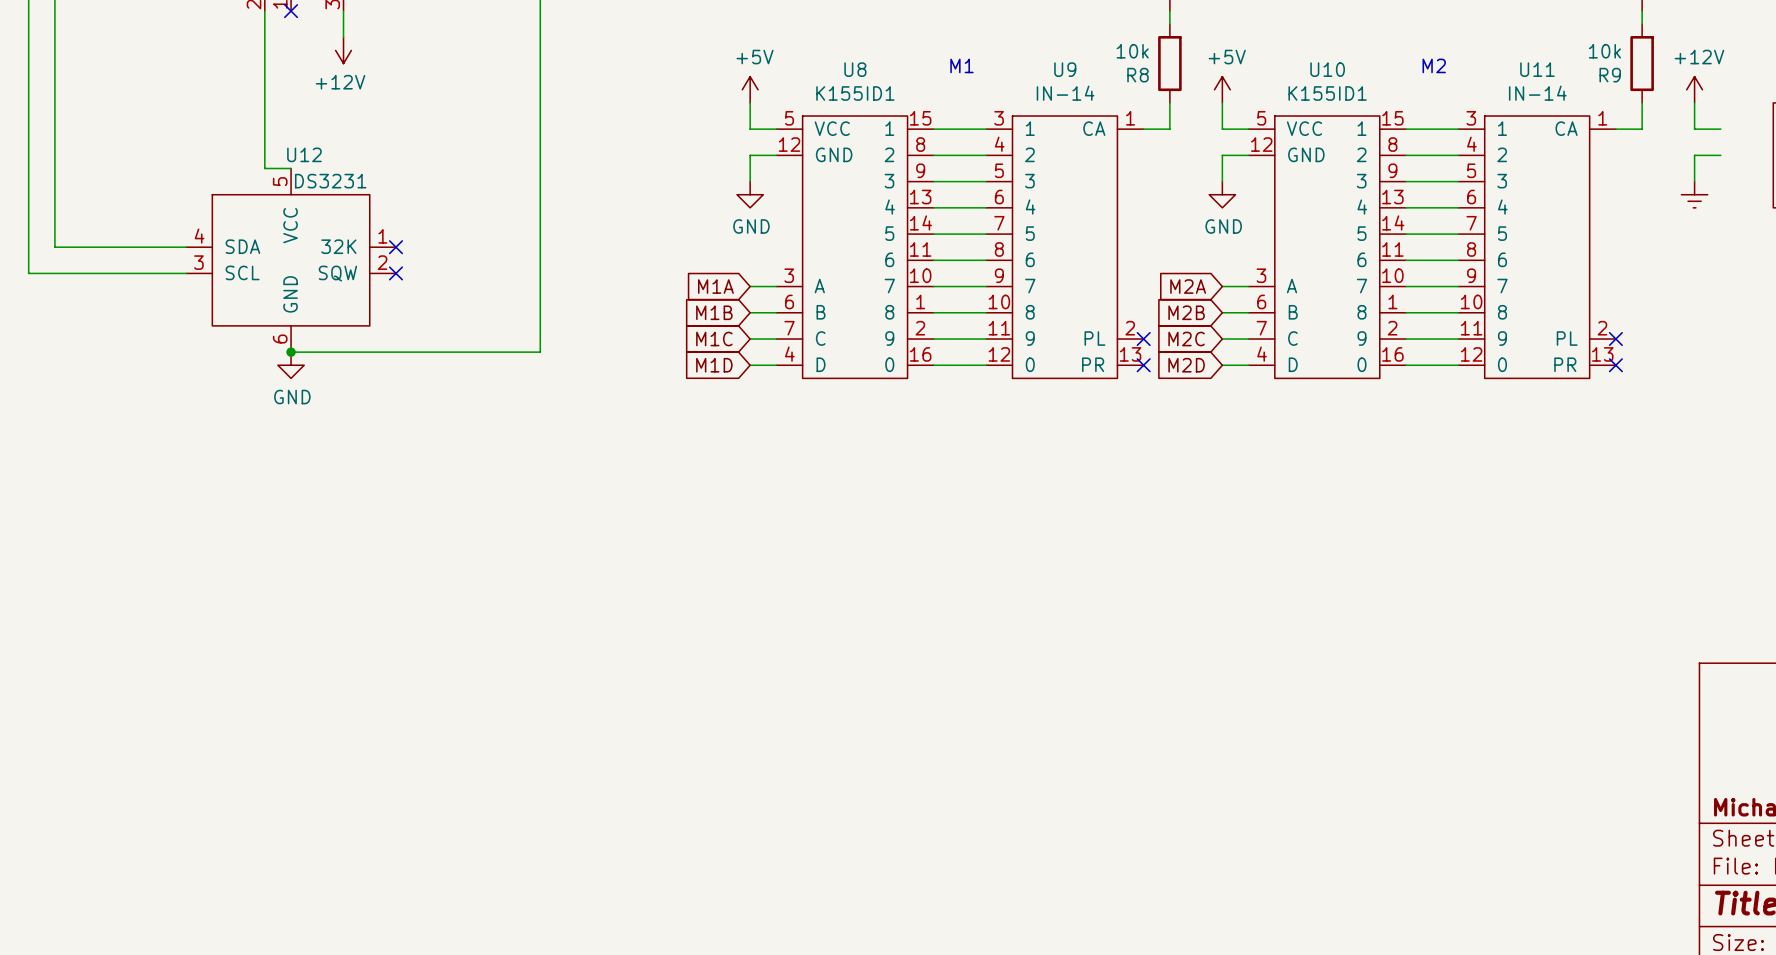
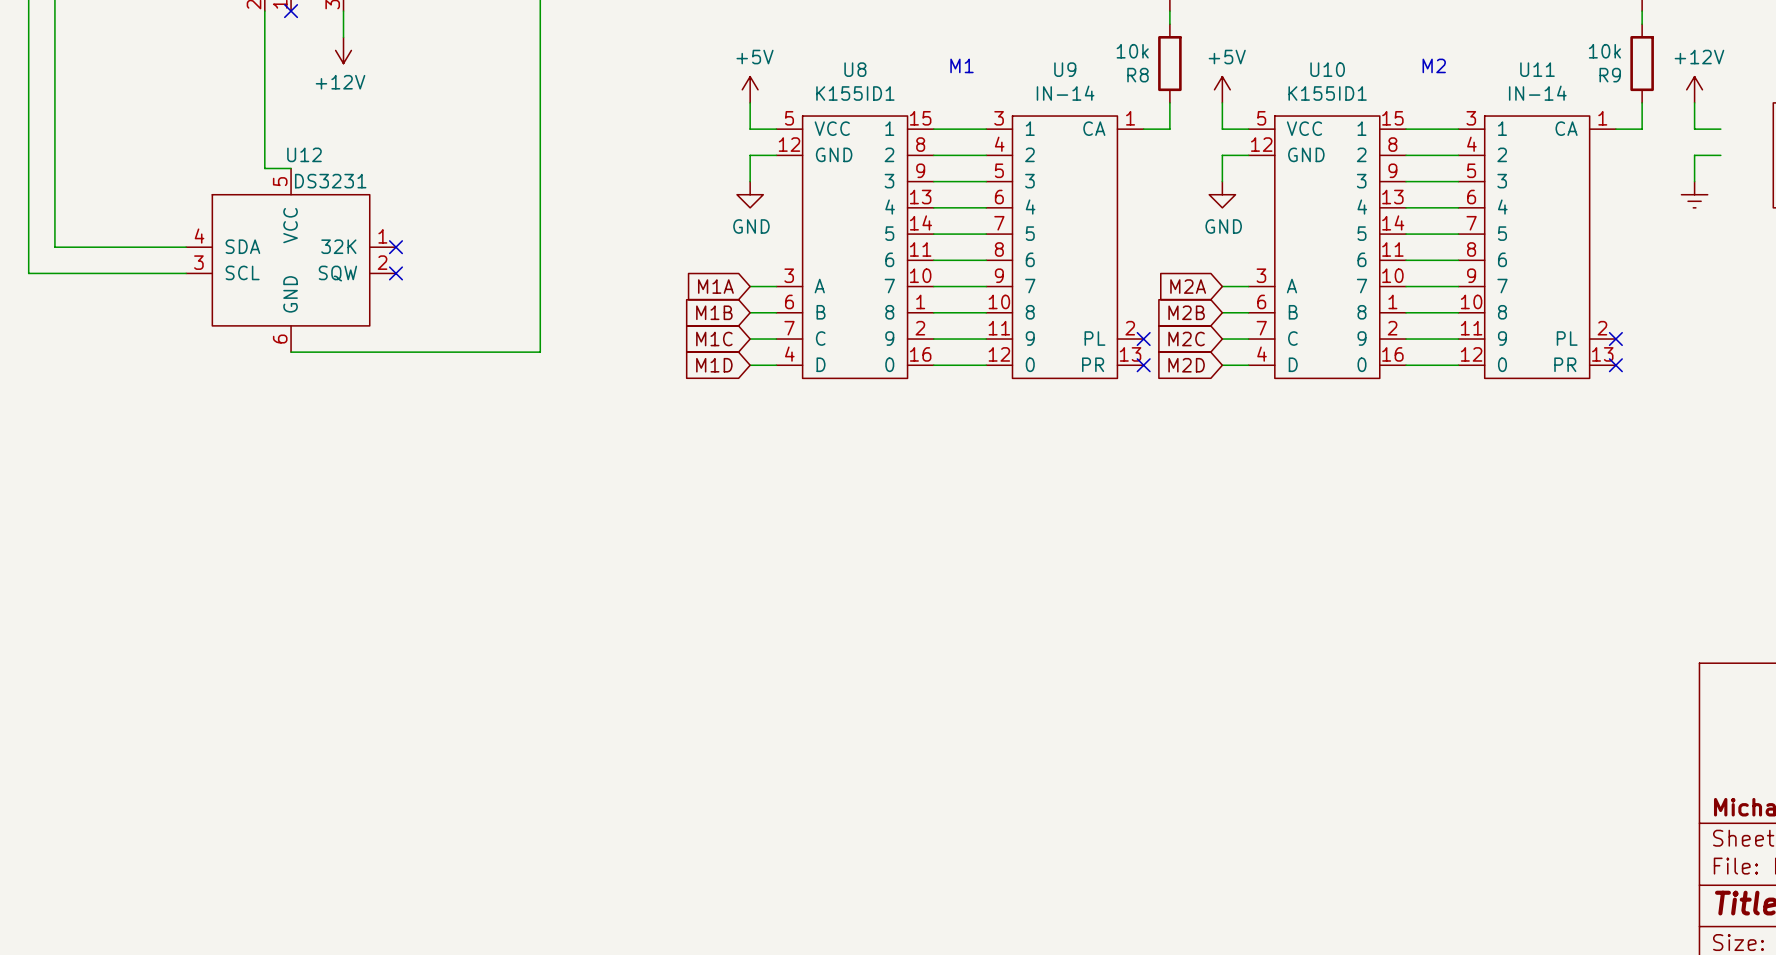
junction: (291, 352) -> none
power symbol: GND (291, 365) -> none

